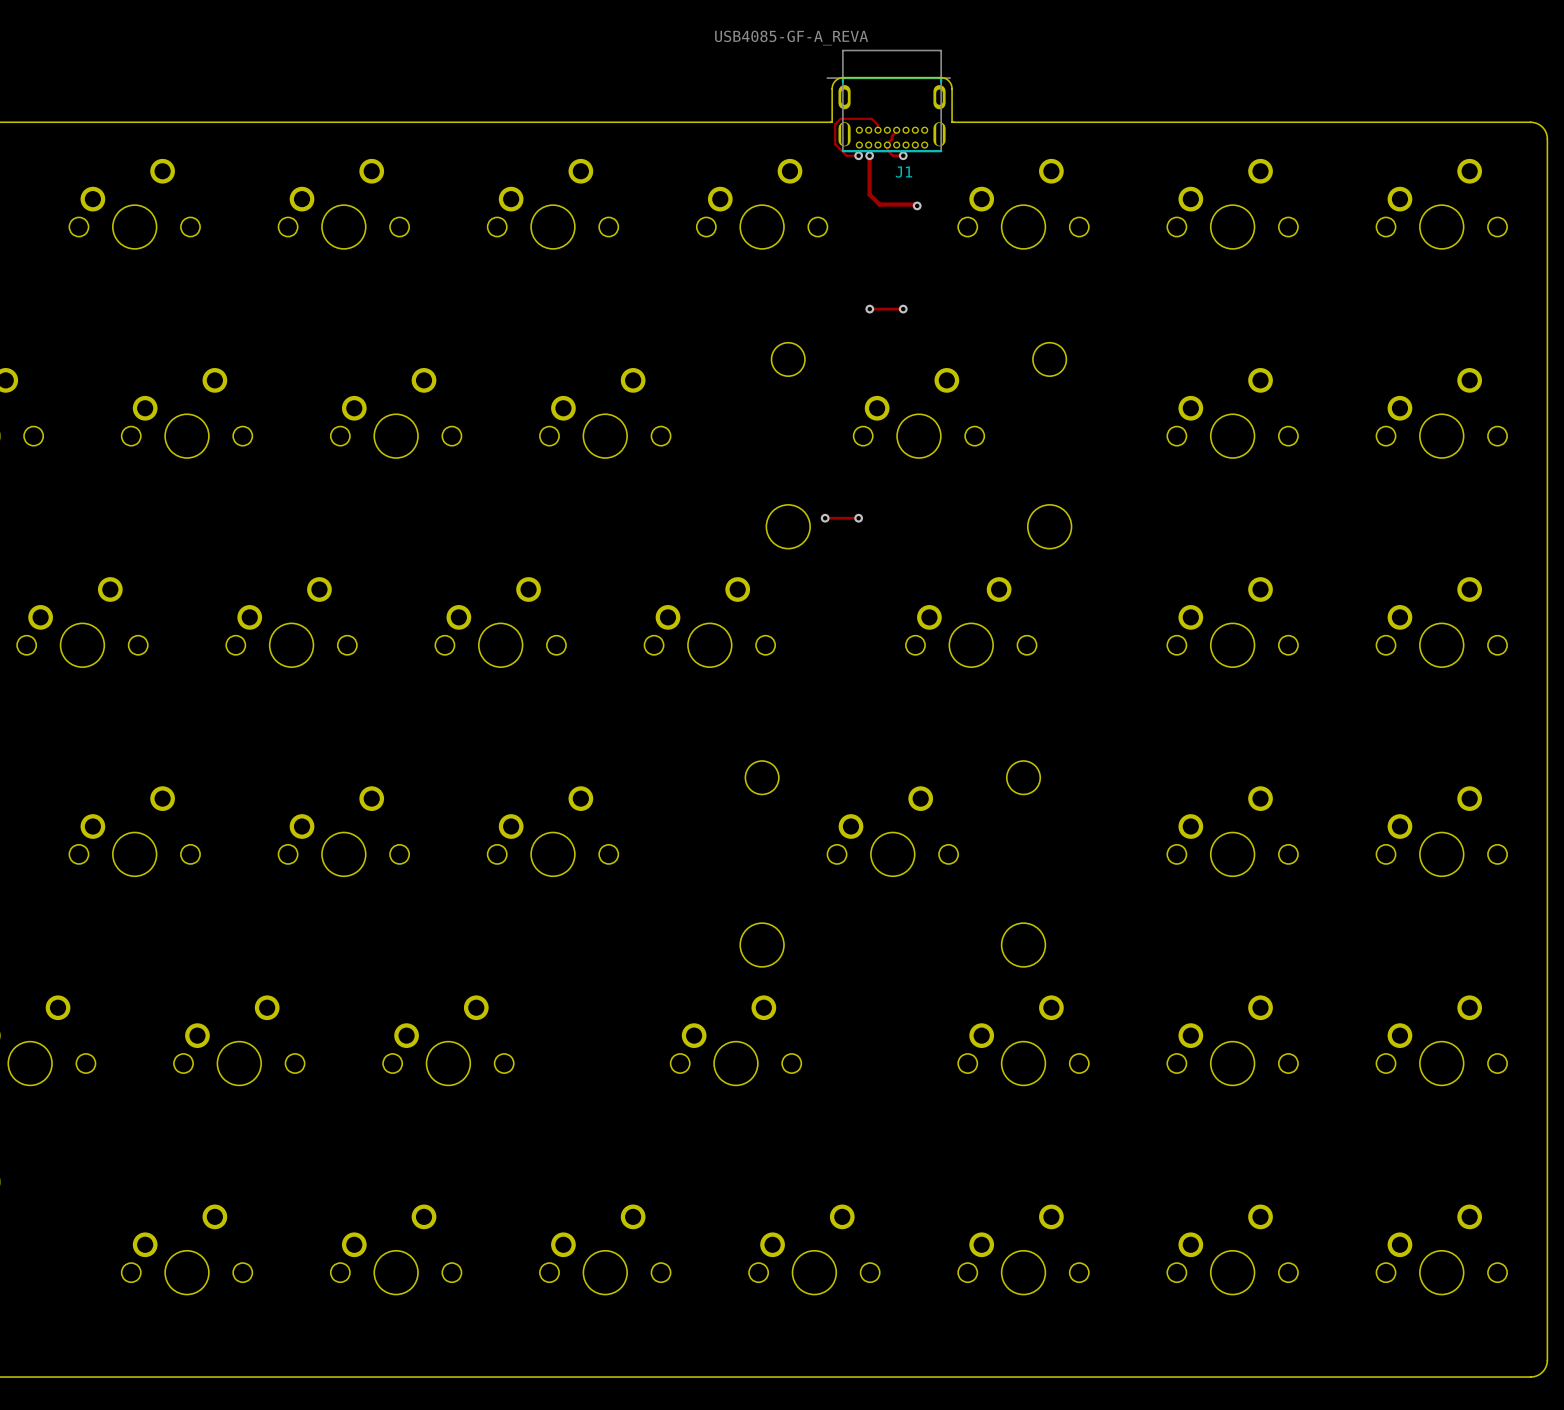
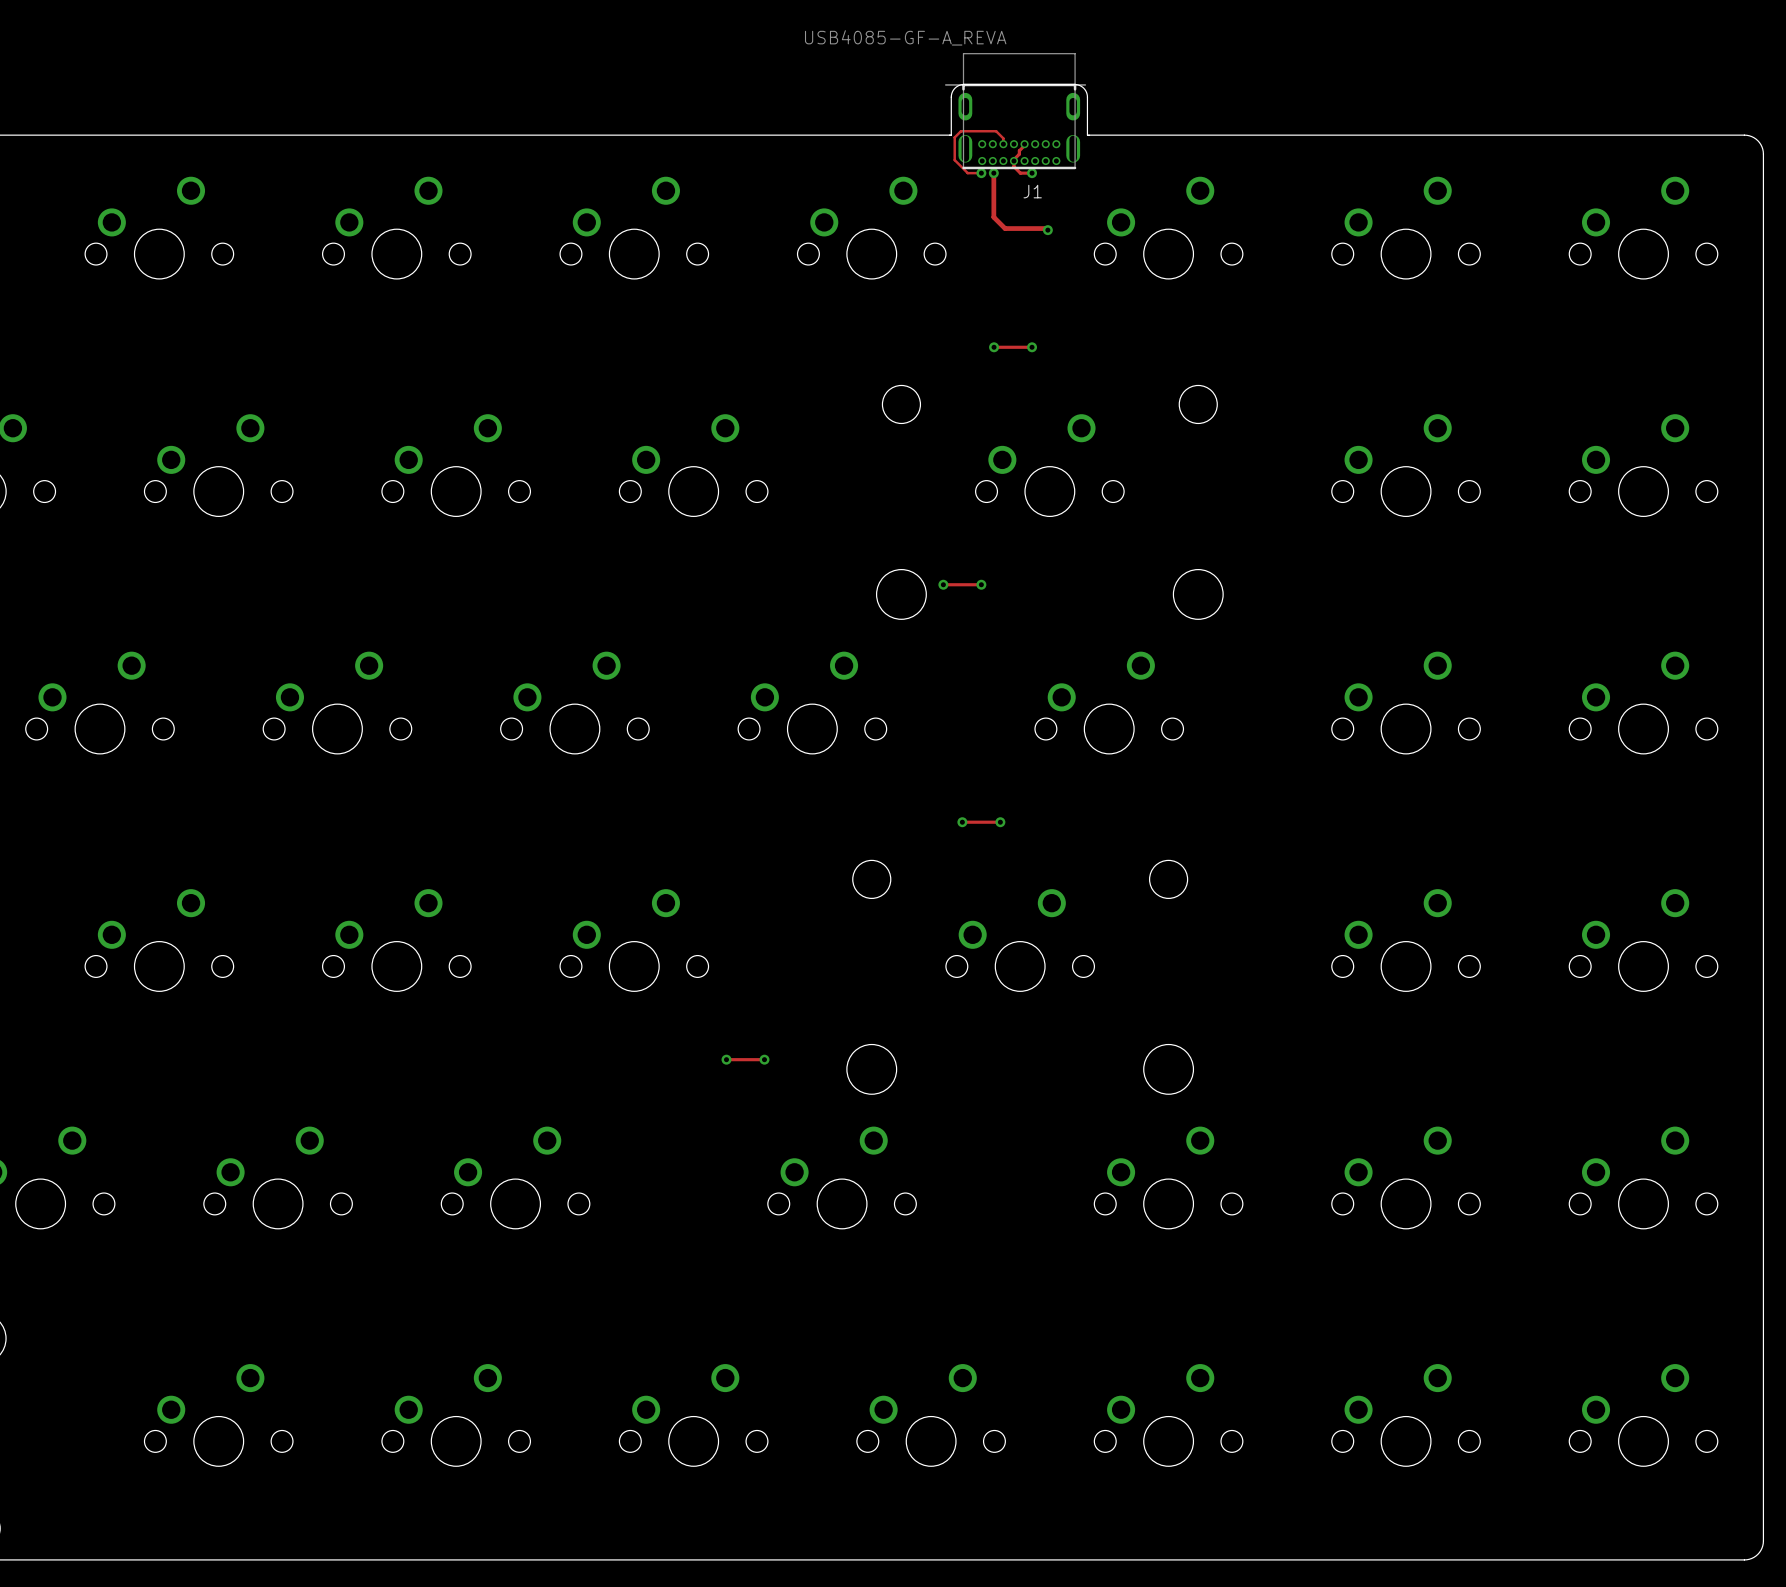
track: none -> (962, 822) (1000, 822)
via: none -> (962, 822)
via: none -> (1000, 822)
track: none -> (726, 1059) (764, 1059)
via: none -> (726, 1059)
via: none -> (764, 1059)

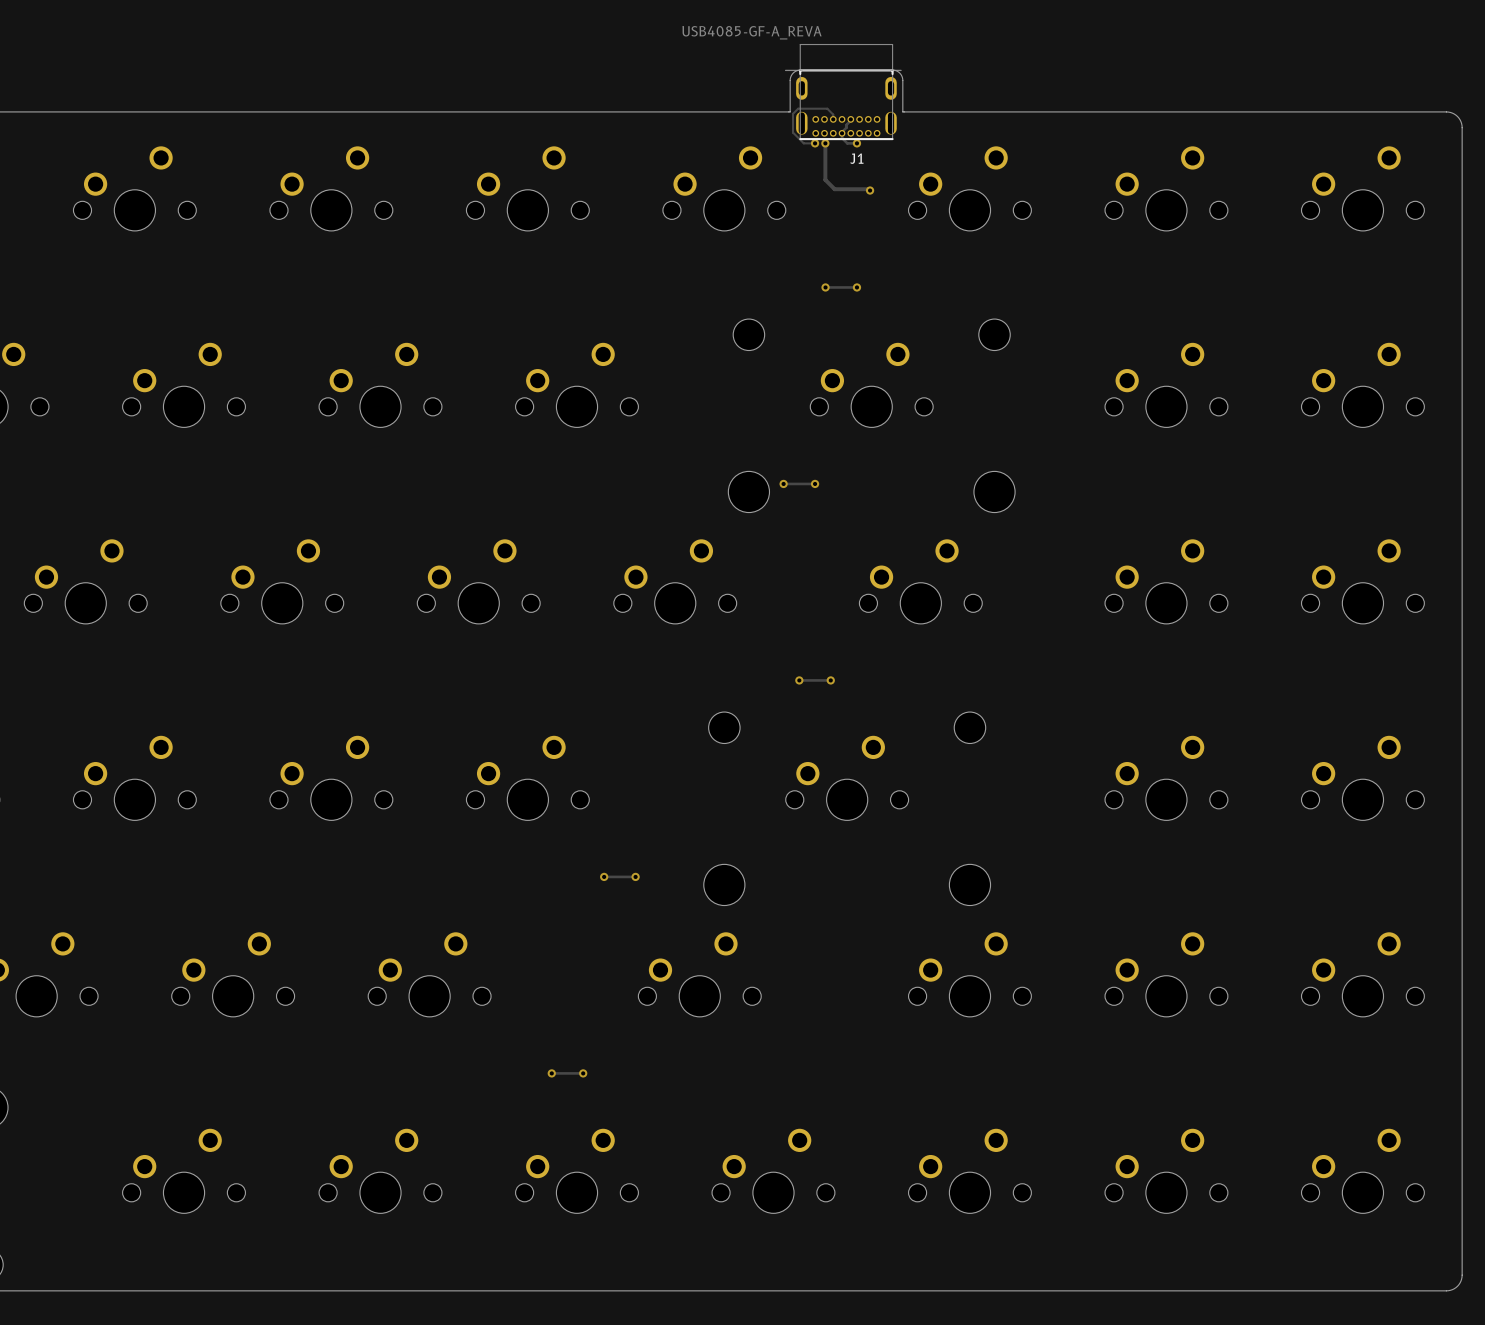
track: none -> (551, 1073) (583, 1073)
via: none -> (551, 1073)
via: none -> (583, 1073)

